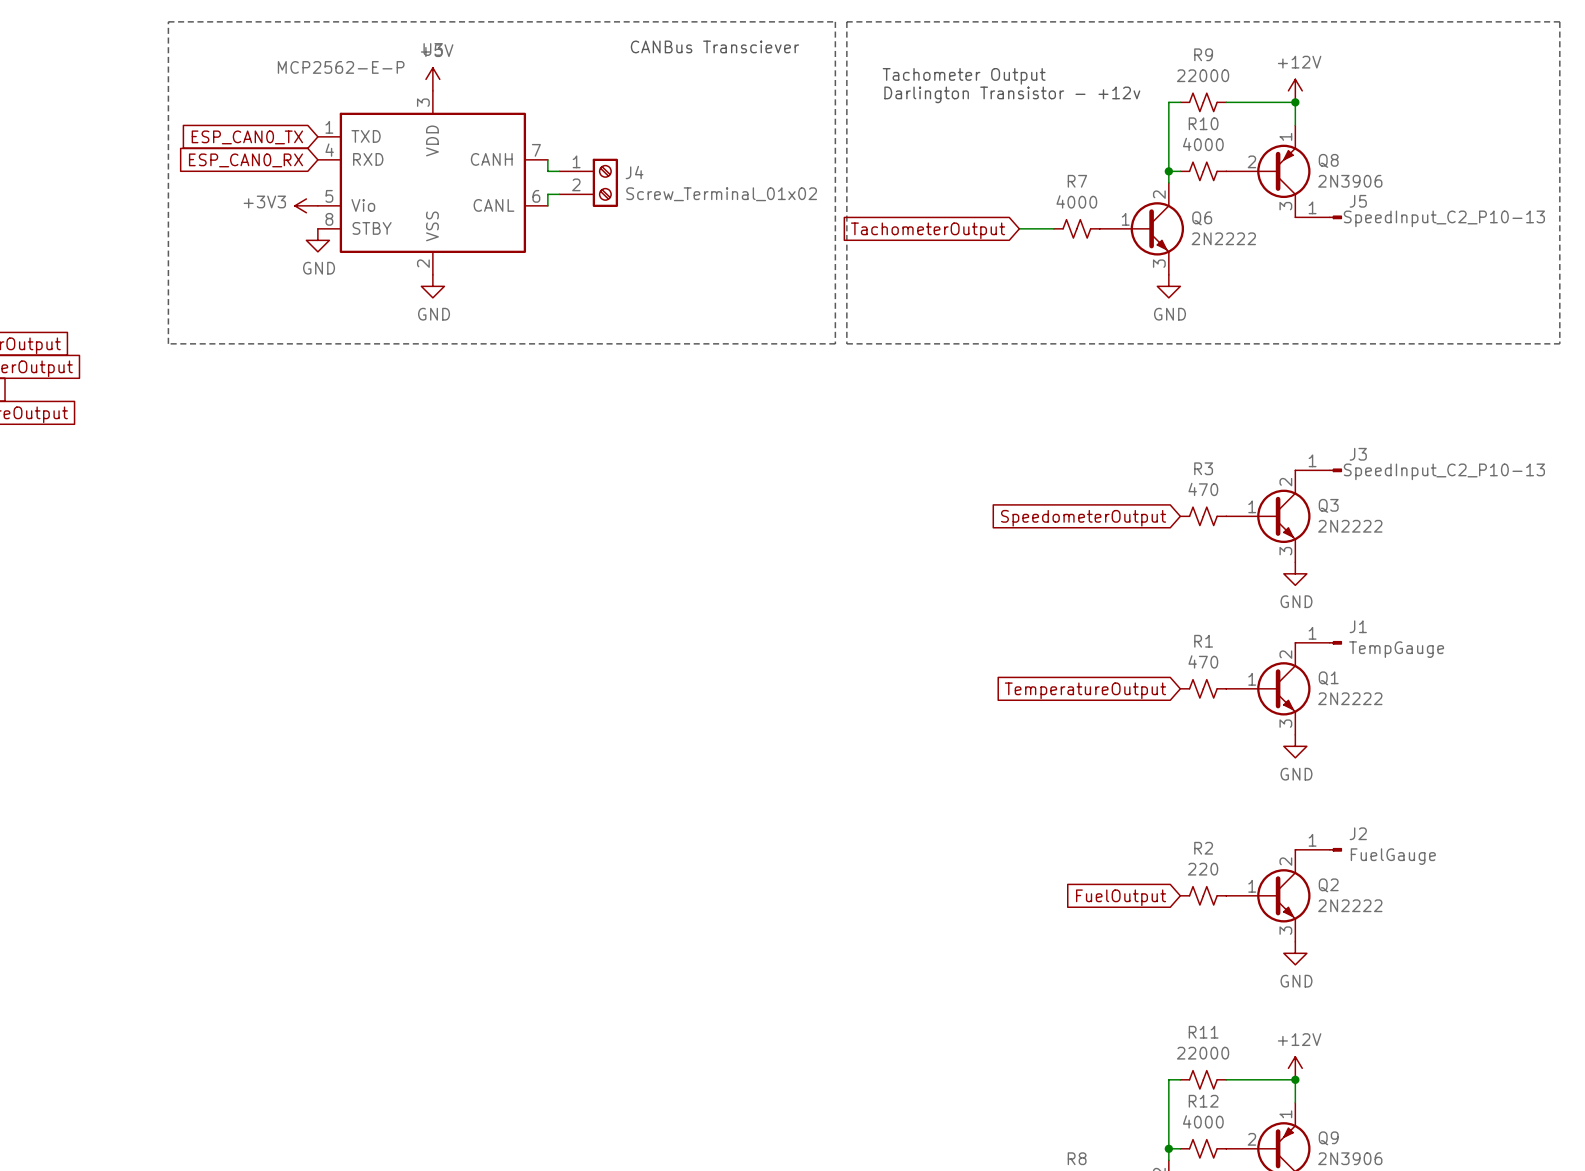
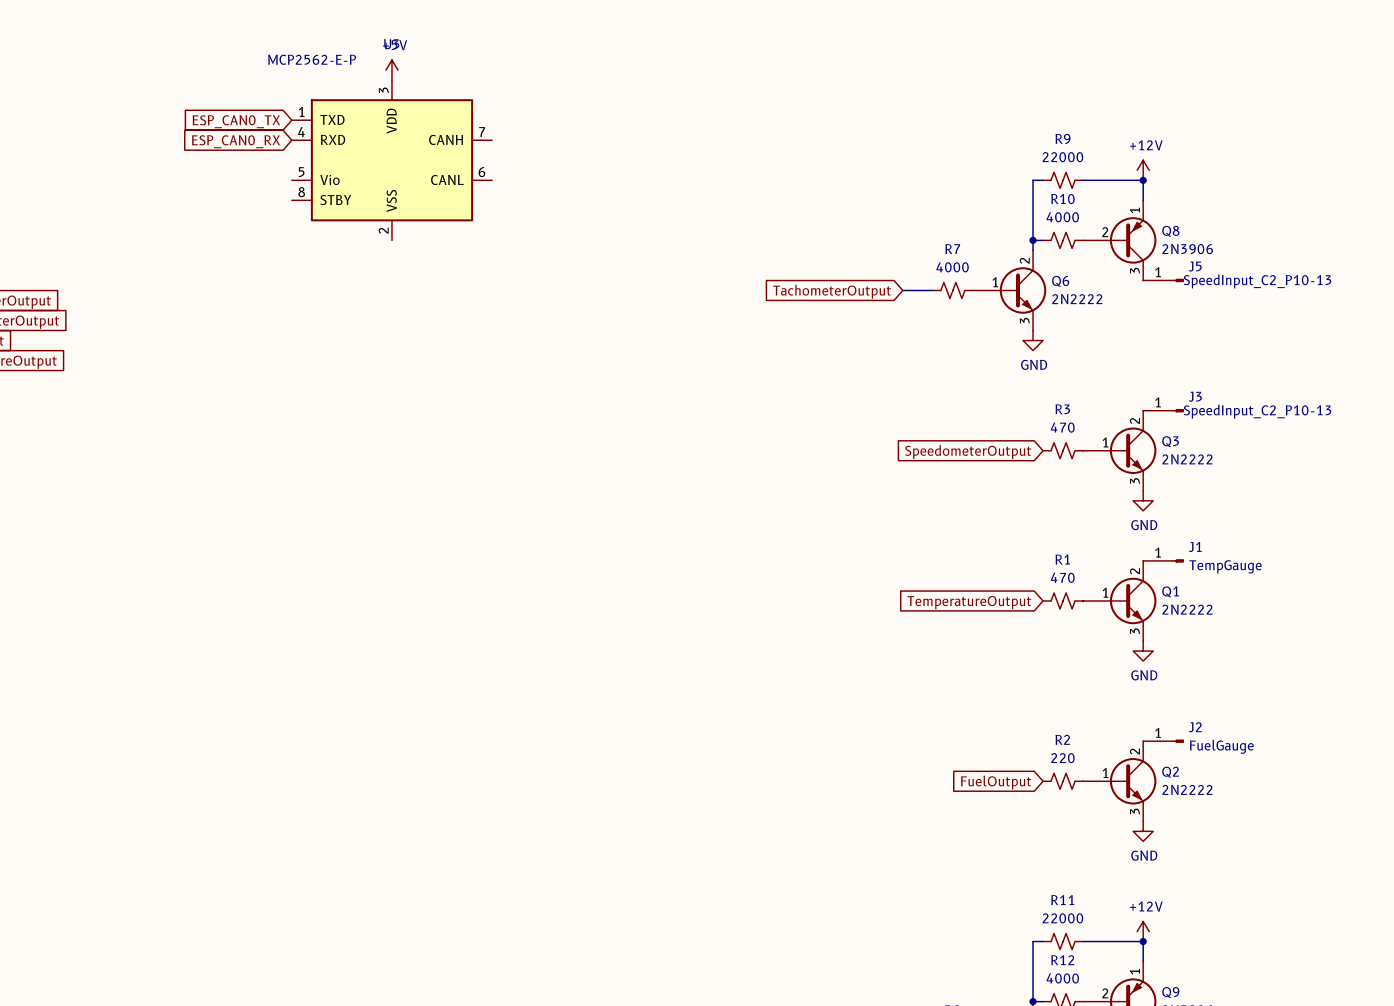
line: (168, 21) (835, 21) (835, 343) (168, 343) (168, 21) -> none
line: (846, 21) (1559, 21) (1559, 343) (846, 343) (846, 21) -> none
text: CANBus Transciever (714, 46) -> none
text: Tachometer Output (964, 76) -> none
power symbol position: +12V (1295, 90) -> +12V (1143, 170)
text: Darlington Transistor - +12v (1012, 94) -> none
wire: (1180, 102) (1168, 102) (1168, 182) -> (1043, 180) (1033, 180) (1033, 250)
R9 position: (1203, 102) -> (1063, 180)
wire: (1226, 102) (1295, 102) (1295, 125) -> (1083, 180) (1143, 180) (1143, 200)
junction: (1295, 102) -> none
wire: (547, 159) (547, 171) (559, 171) -> none
wire: (1168, 171) (1180, 171) -> (1033, 240) (1043, 240)
junction: (1168, 171) -> none
R10 position: (1203, 171) -> (1063, 240)
Q8 position: (1268, 171) -> (1119, 240)
J4: Screw_Terminal_01x02 (588, 182) -> none
wire: (559, 194) (547, 194) (547, 205) -> none
power symbol: +3V3 (306, 205) -> none
junction: none -> (1143, 180)
J5 position: (1318, 217) -> (1163, 280)
wire: (1019, 228) (1053, 228) -> (902, 290) (932, 290)
R7 position: (1076, 228) -> (952, 290)
Q6 position: (1141, 228) -> (1009, 290)
global label position: TachometerOutput (928, 230) -> TachometerOutput (832, 291)
power symbol: GND (317, 240) -> none
junction: none -> (1033, 240)
power symbol: GND (432, 286) -> none
power symbol position: GND (1168, 286) -> GND (1033, 340)

